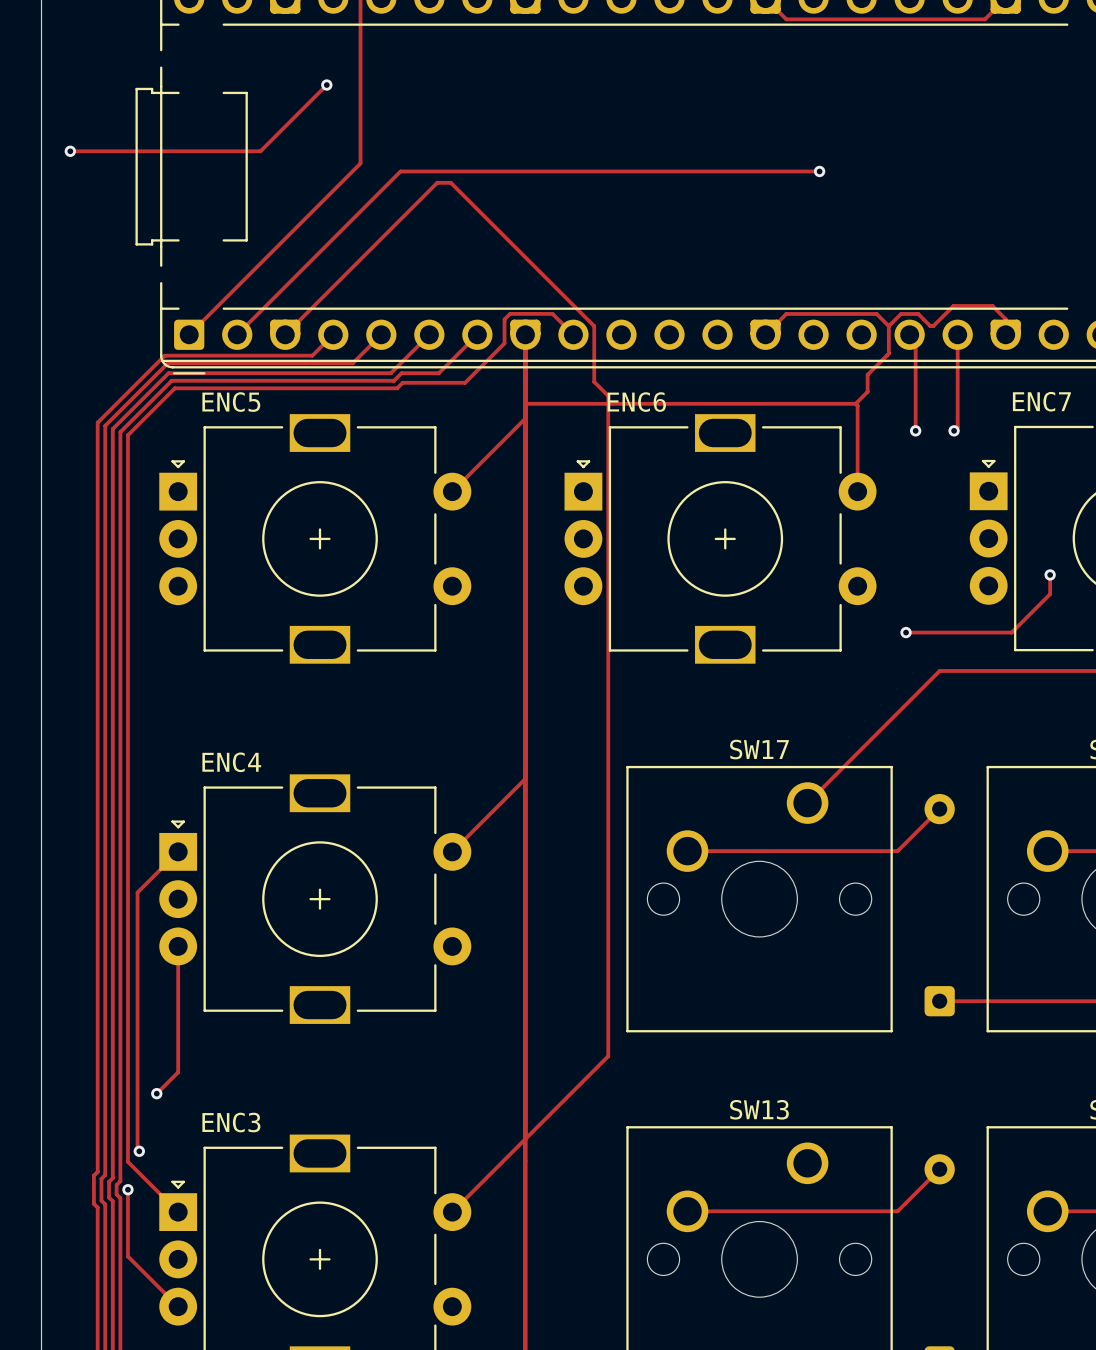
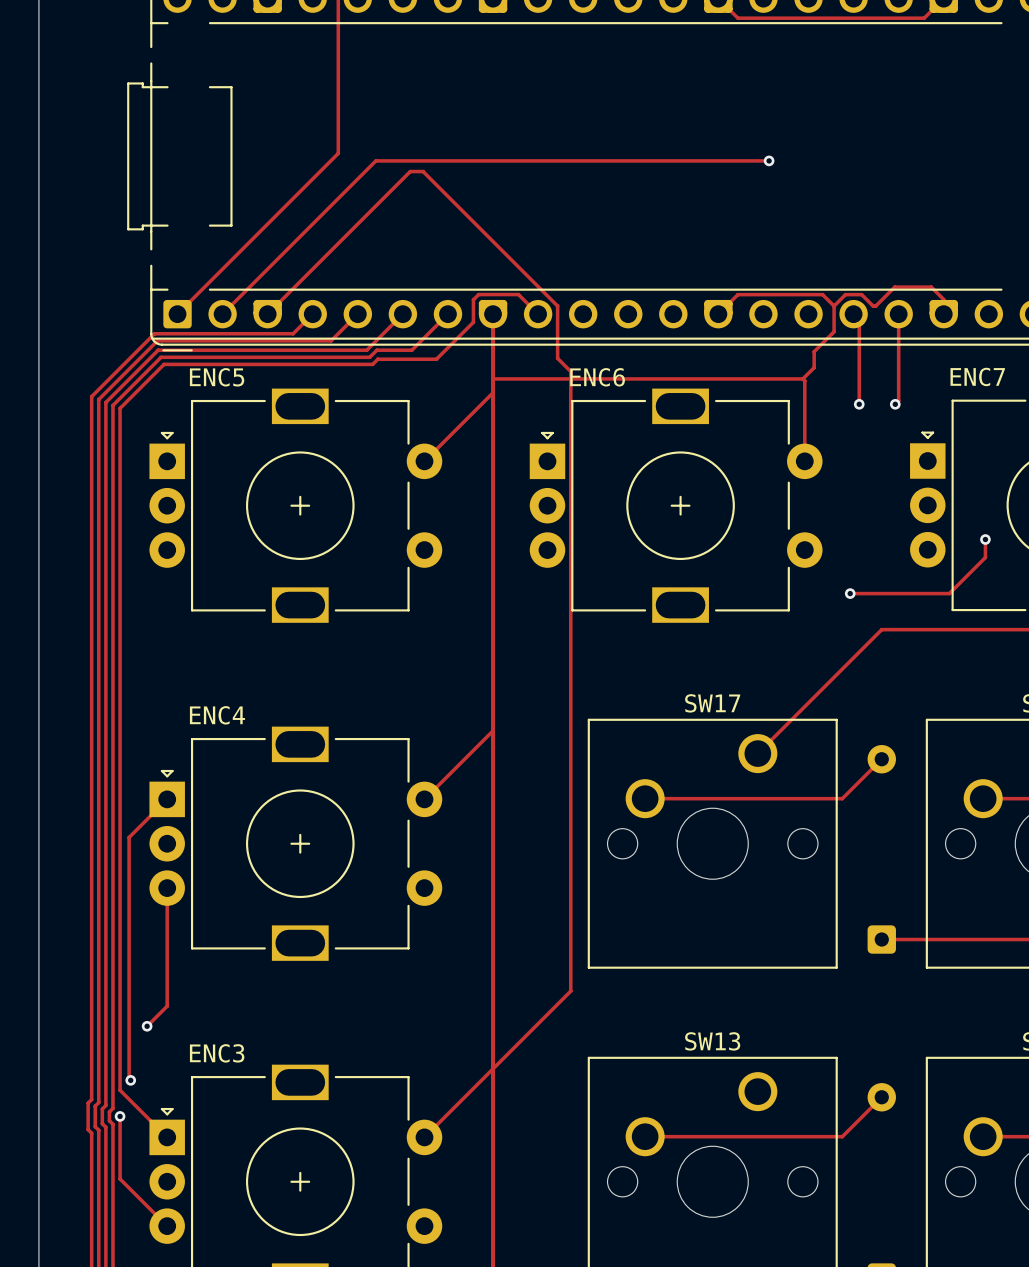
track: (326, 85) (260, 151) (70, 151) -> none
via: (326, 85) -> none
via: (70, 151) -> none

